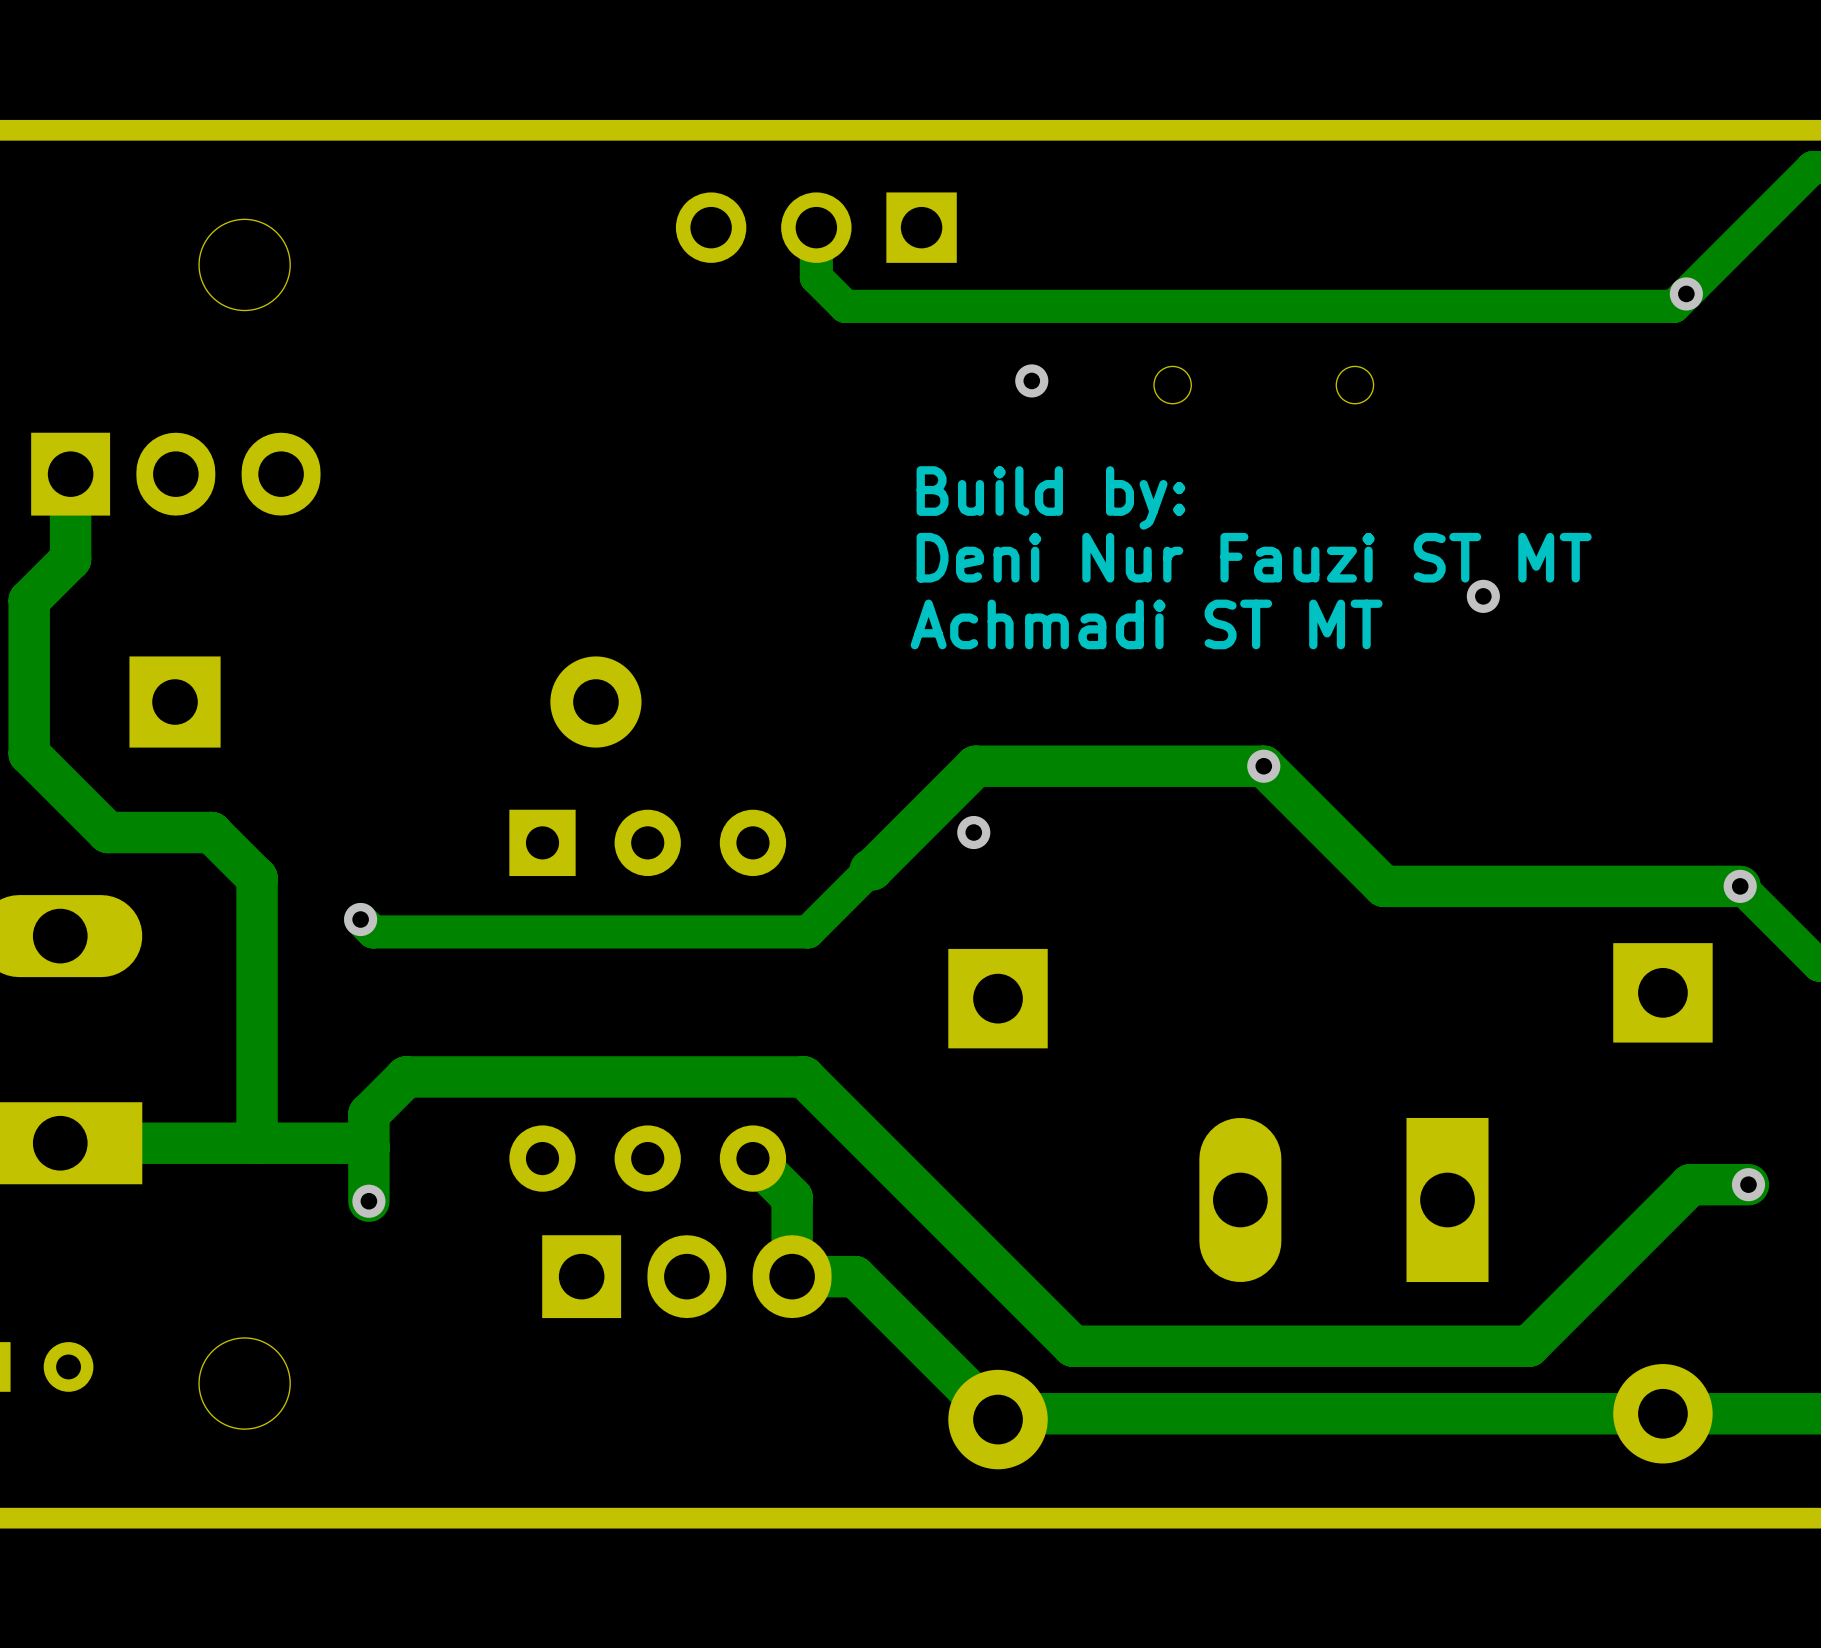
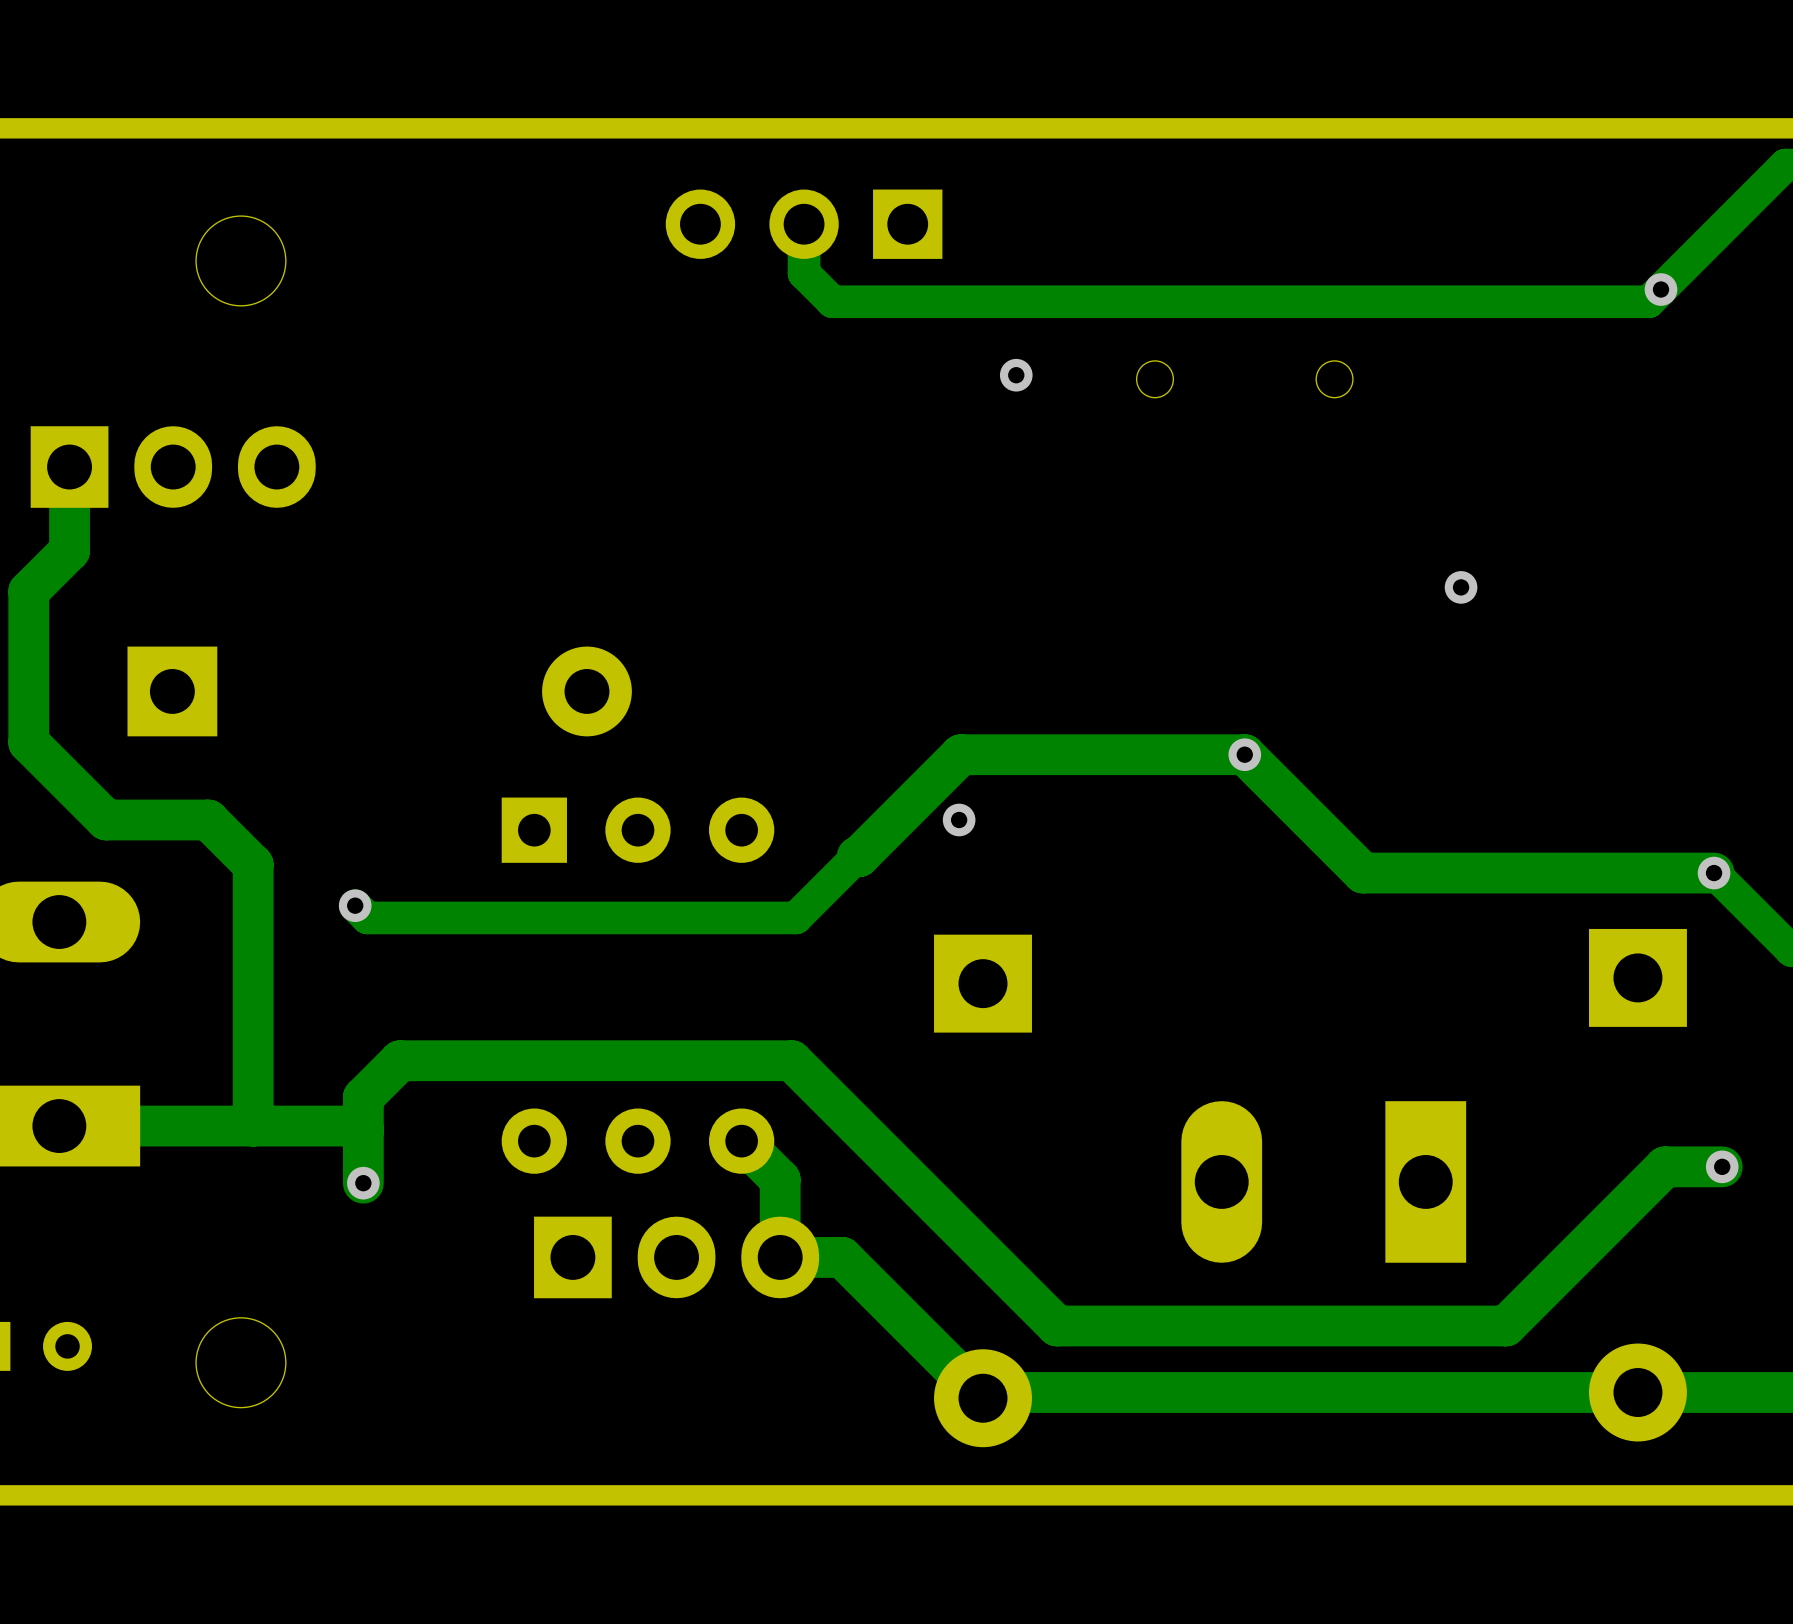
text: Build by: (1050, 497) -> none
text: Deni Nur Fauzi ST MT (1254, 557) -> none
text: Achmadi ST MT (1146, 624) -> none

